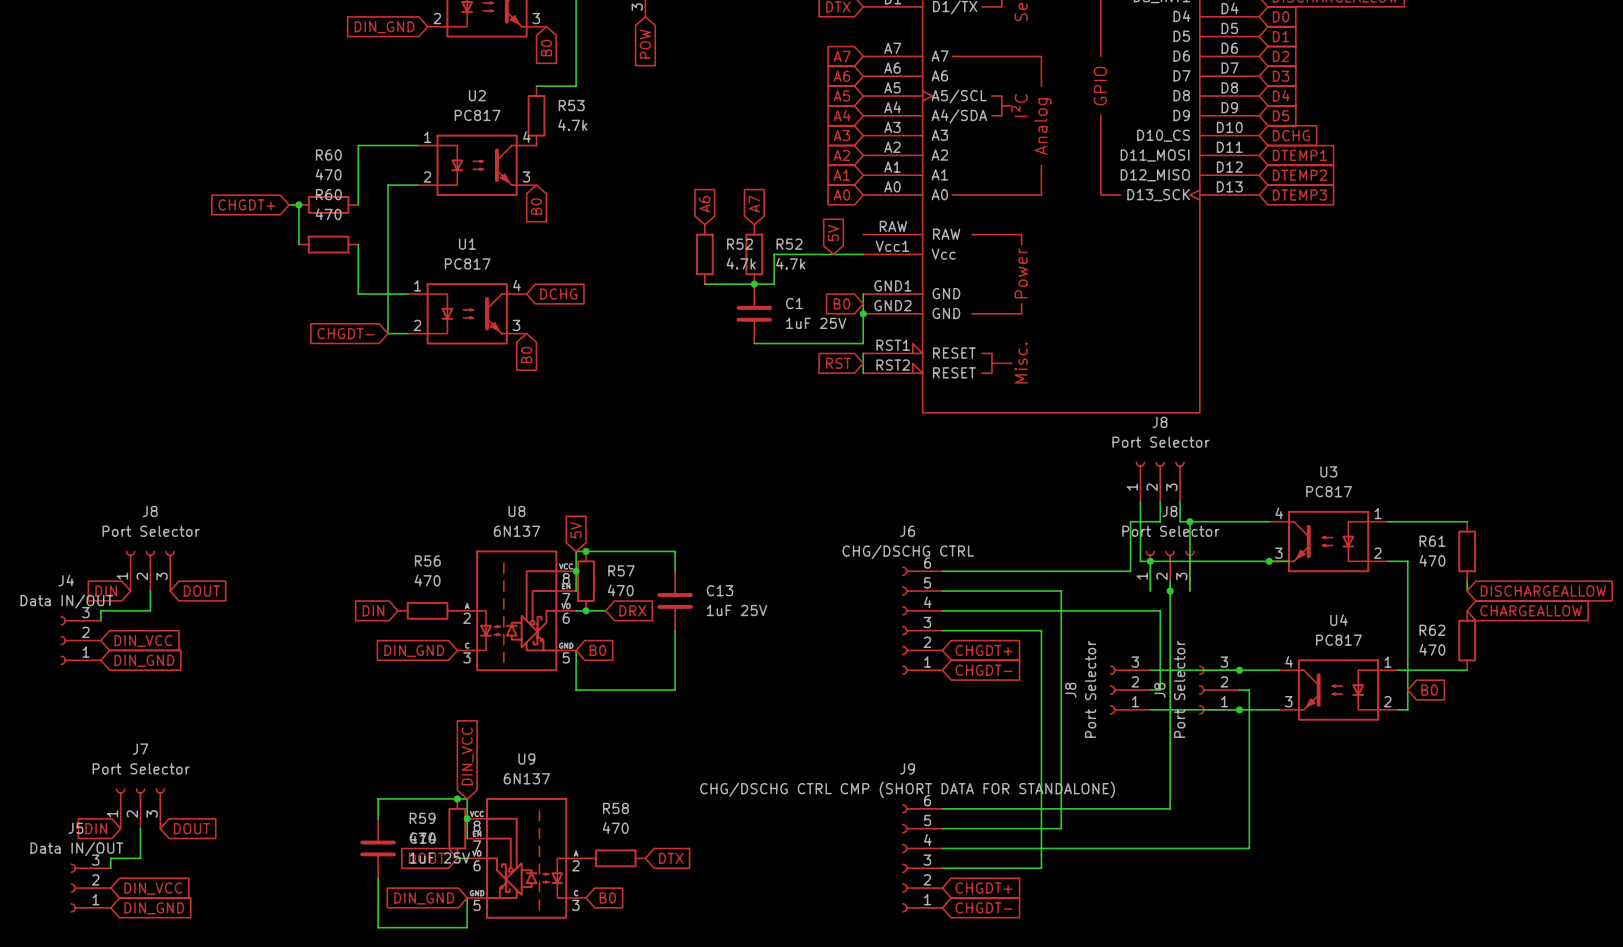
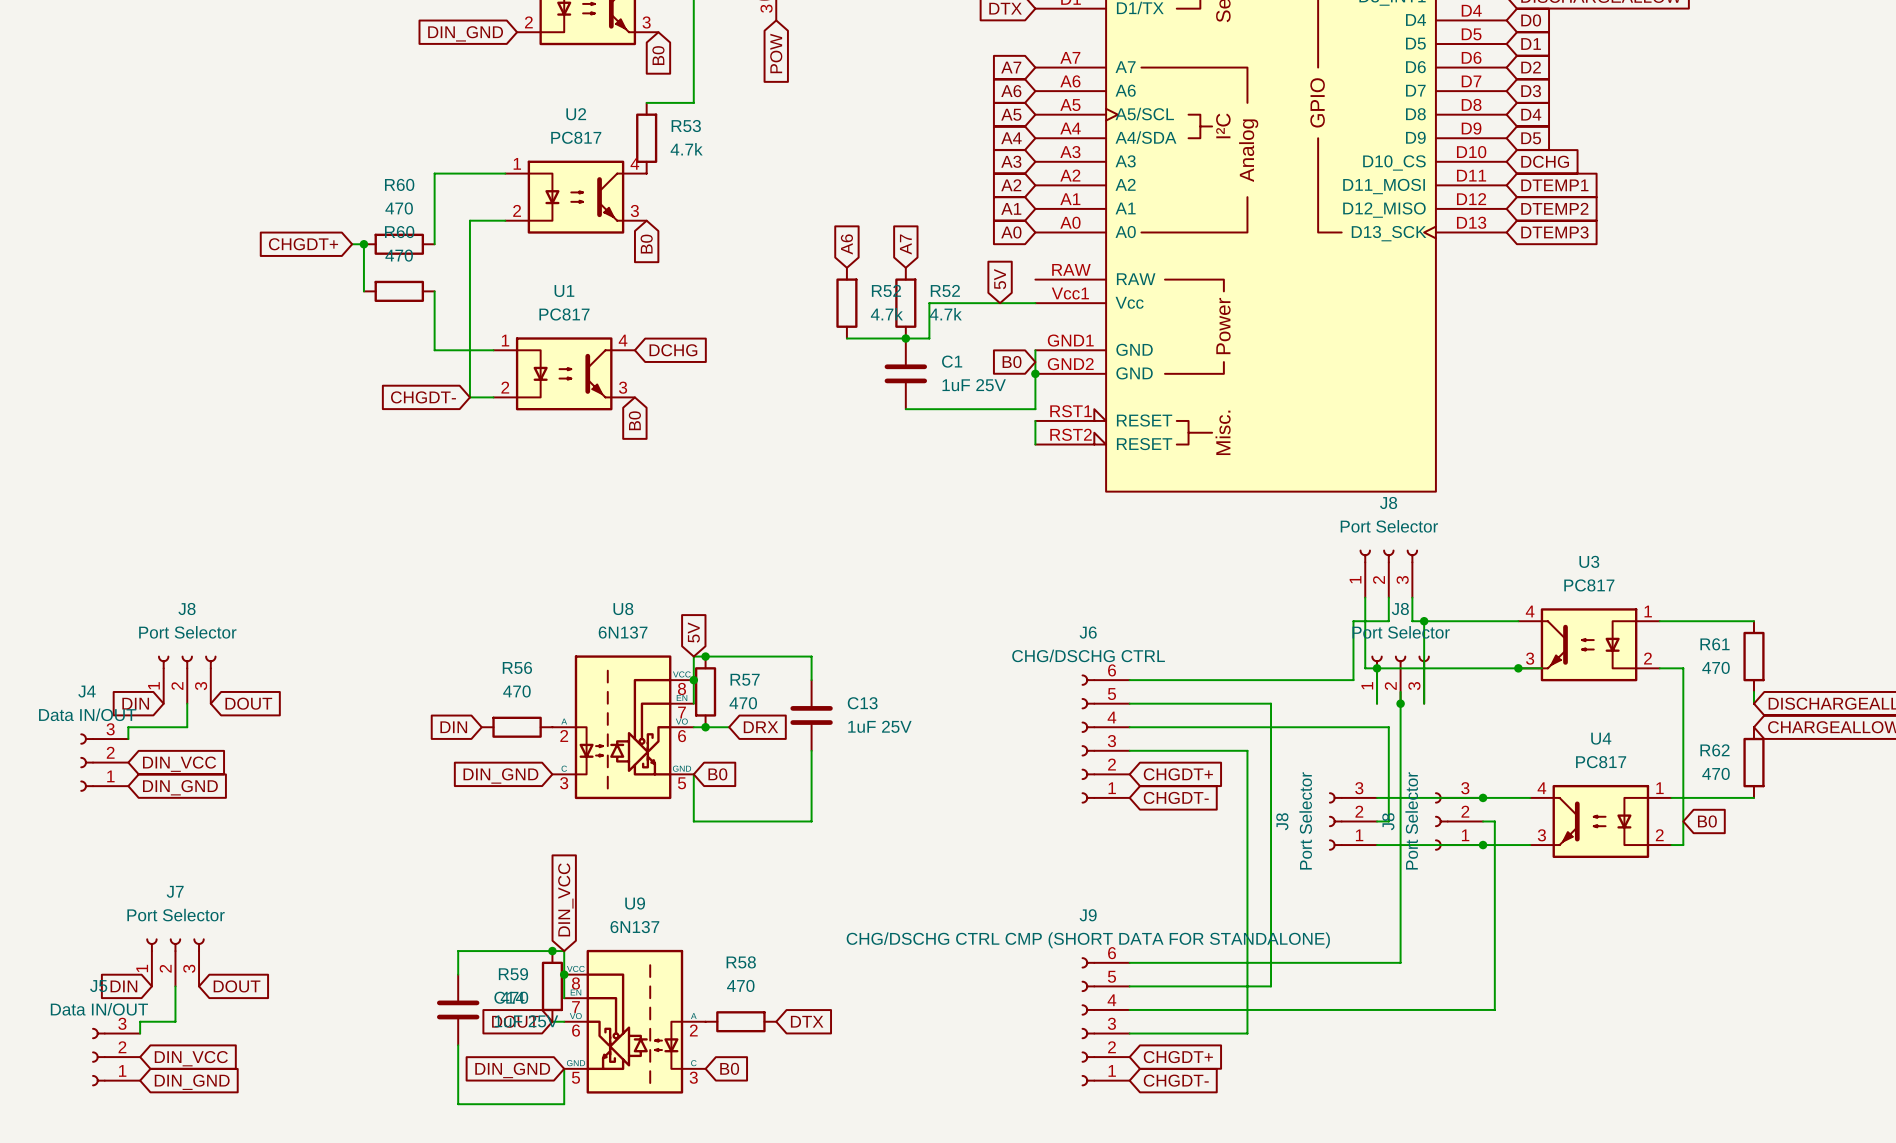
global label: RST (838, 363) -> none

